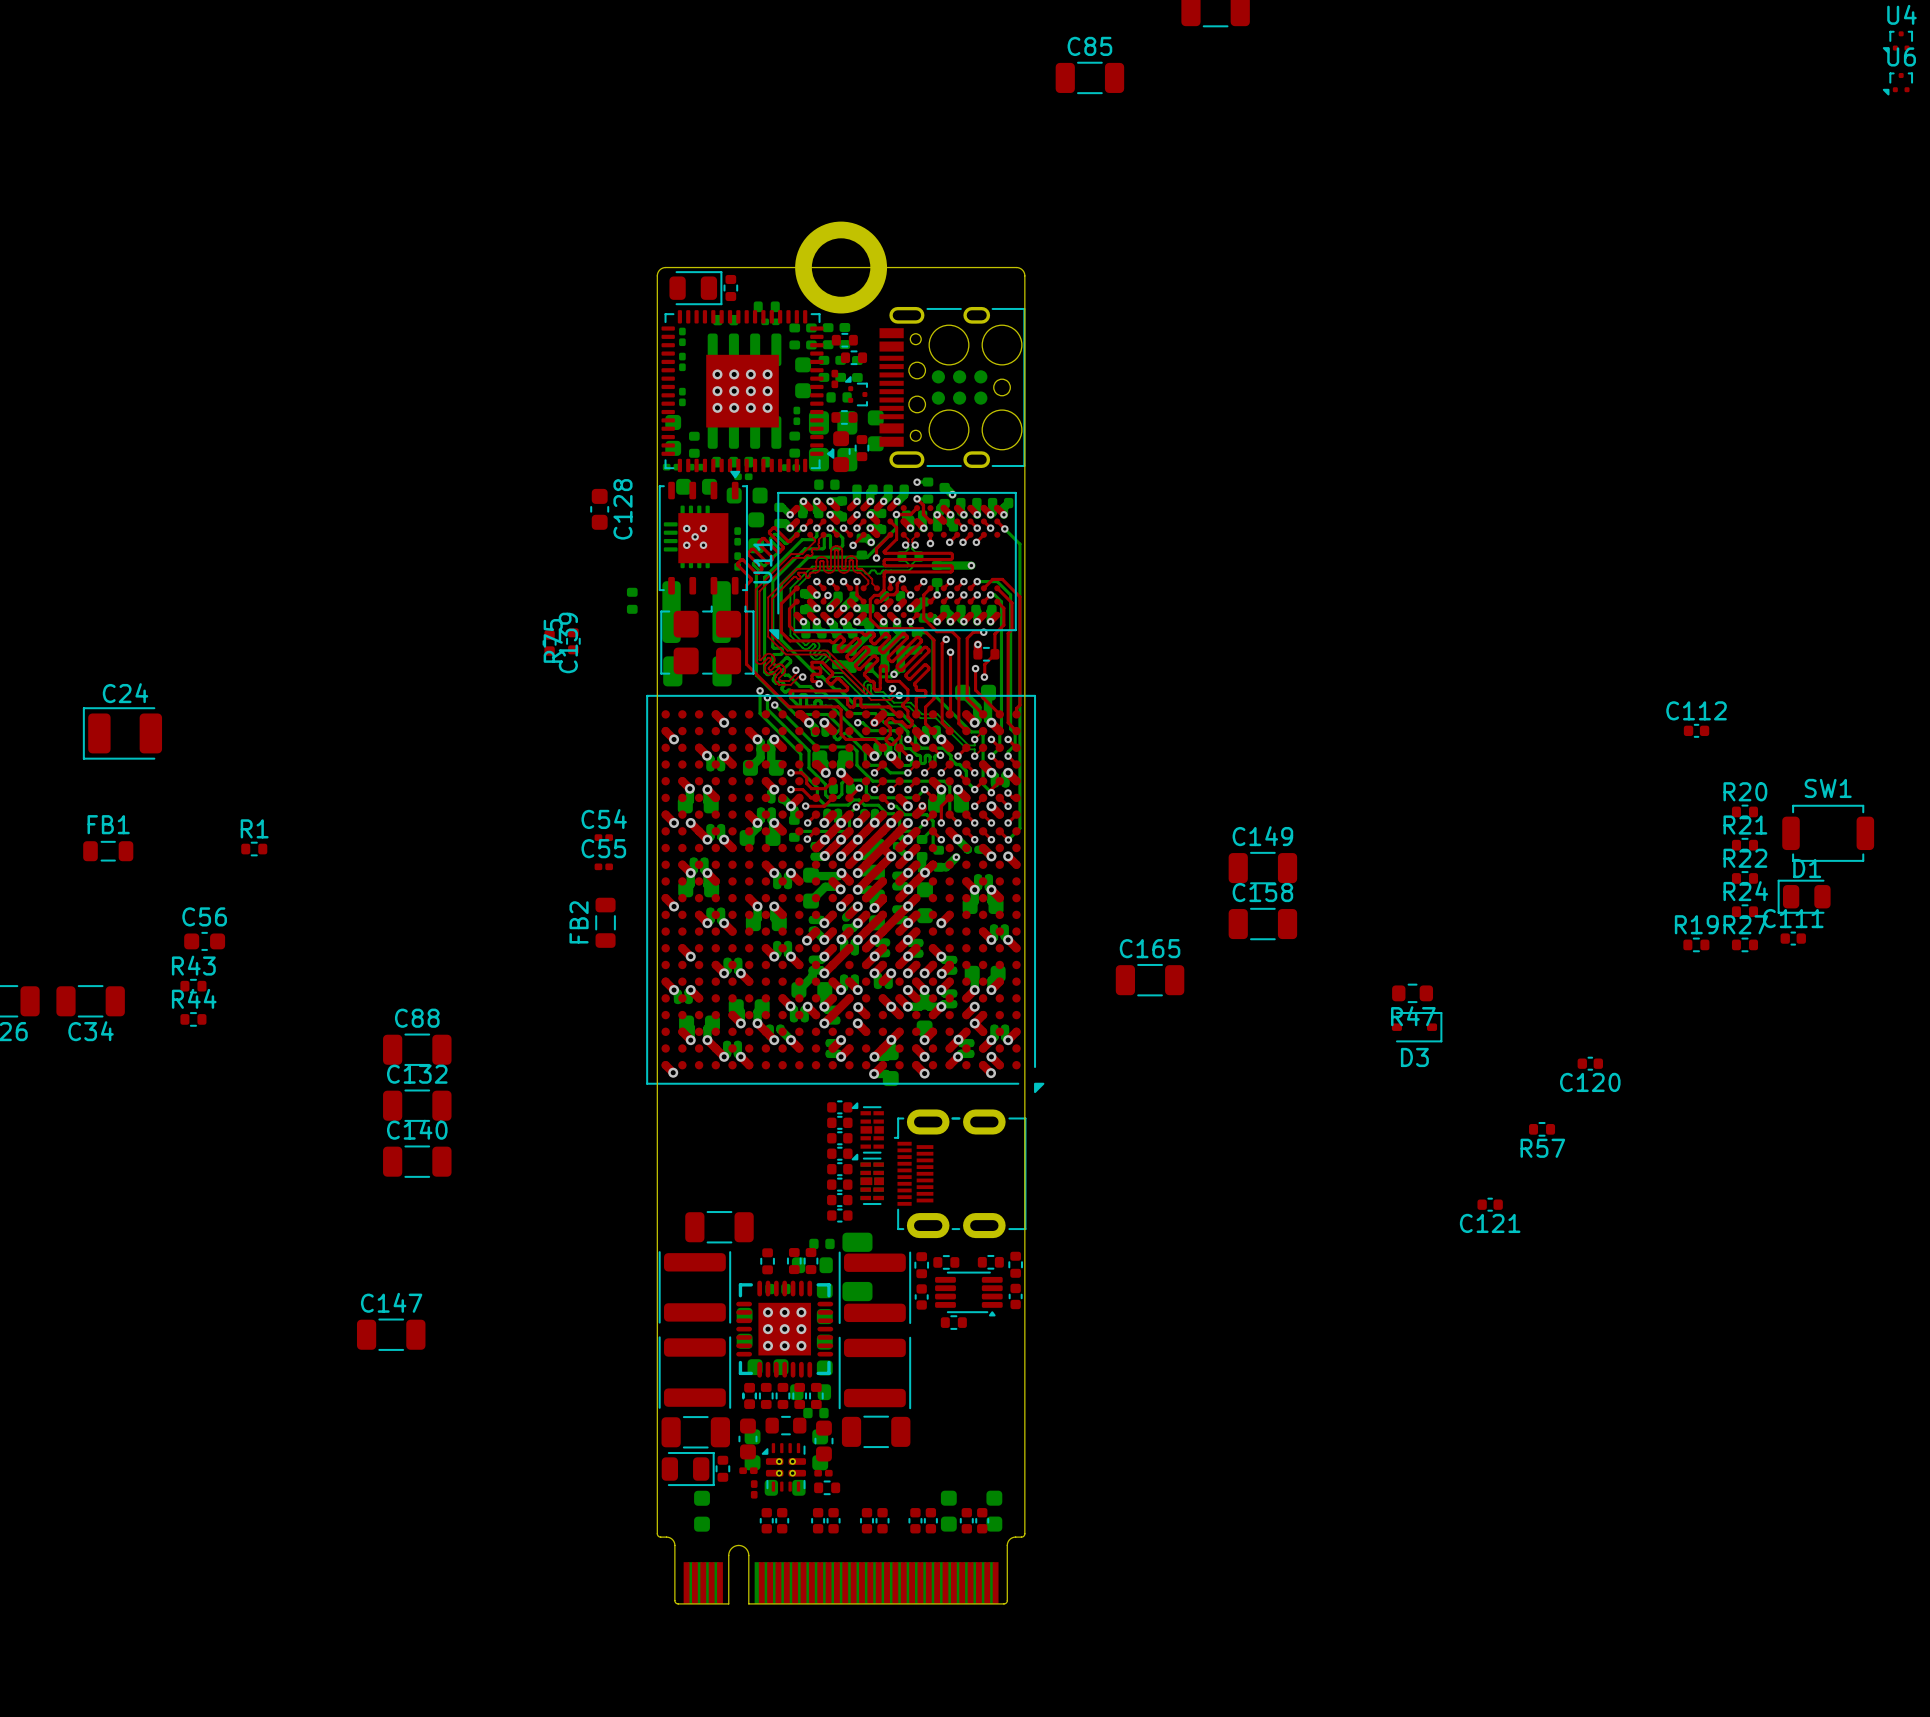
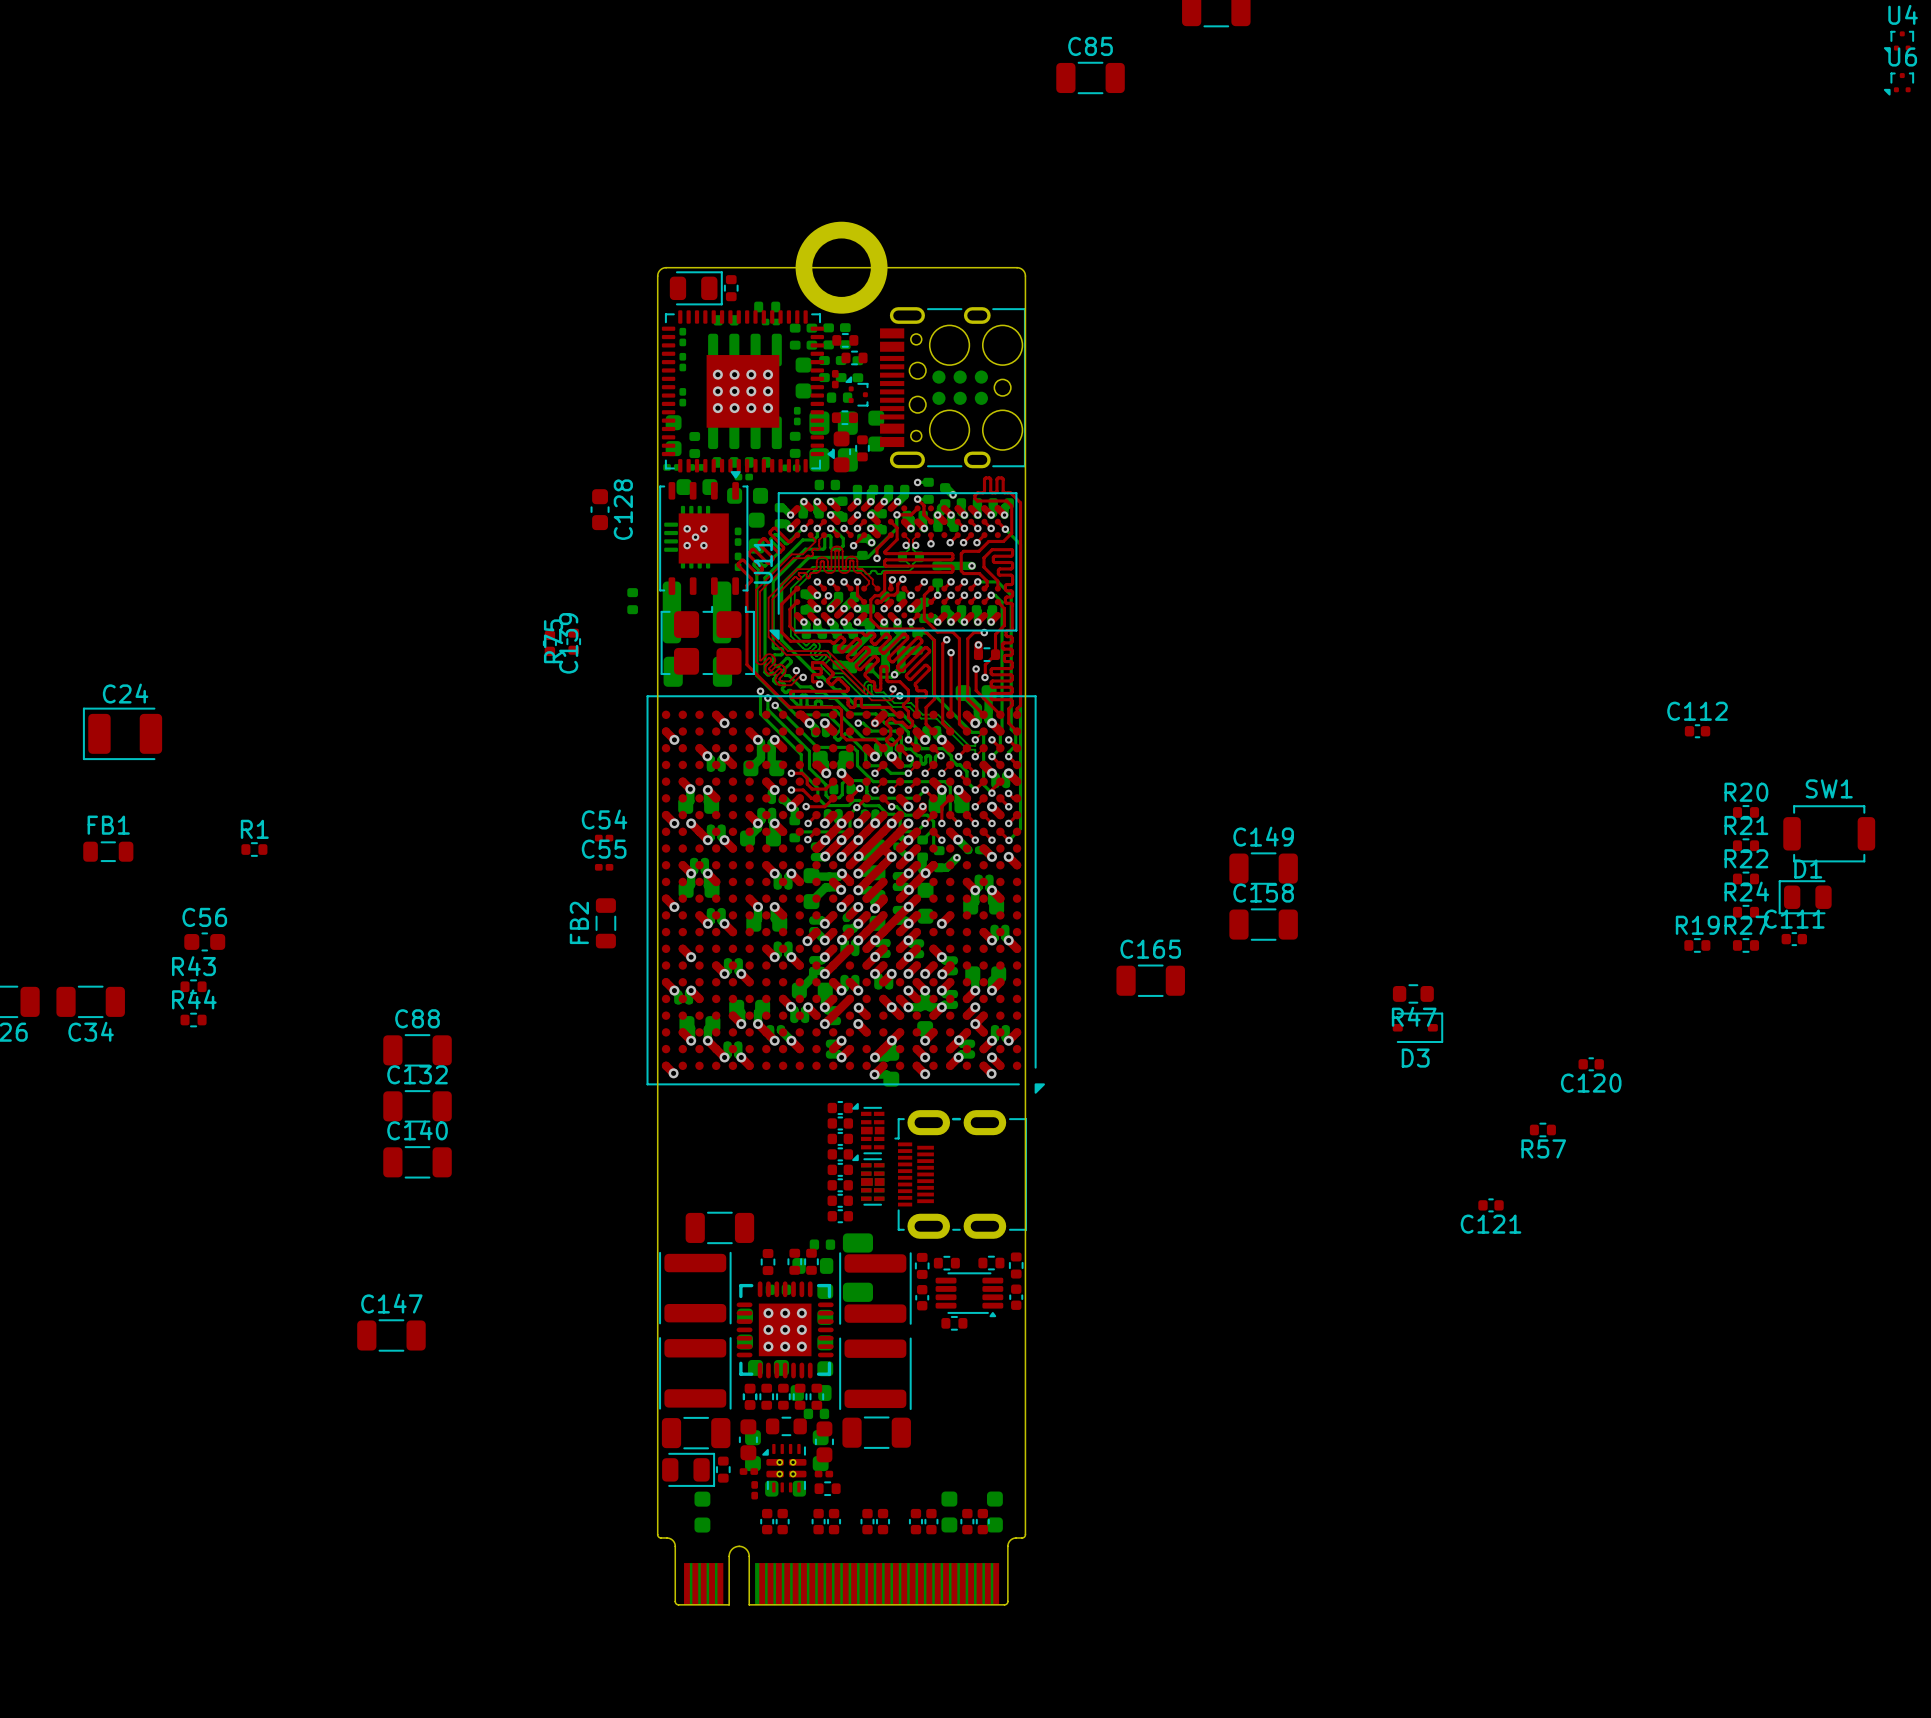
top track: (986, 585) (992, 579) (1002, 579) (1019, 596) -> (987, 585) (987, 581) (979, 573) (963, 573) (961, 570) (961, 553) (963, 551) (978, 551) (988, 541) (1003, 541) (1011, 533) (1011, 506) (1006, 501) (977, 501) (974, 498) (977, 492) (984, 491) (985, 478) (990, 478) (990, 491) (995, 492) (997, 478) (1001, 477) (1003, 492) (1010, 492) (1020, 502) (1020, 597)
top track: (997, 588) (1011, 602) (1011, 629) (1008, 633) (1008, 708) -> (997, 588) (997, 581) (983, 567) (983, 557) (992, 549) (1011, 549) (1011, 556) (993, 557) (994, 562) (1012, 563) (1011, 568) (998, 570) (999, 575) (1012, 576) (1012, 584) (1005, 586) (1005, 590) (1012, 592) (1011, 596) (1005, 598) (1005, 602) (1012, 604) (1012, 629) (1006, 632) (1006, 636) (1011, 637) (1012, 641) (1002, 644) (1003, 648) (1012, 650) (1011, 654) (1005, 655) (1004, 660) (1011, 662) (1012, 667) (991, 670) (992, 674) (1012, 675) (1011, 680) (991, 682) (992, 687) (1011, 687) (1011, 693) (991, 694) (992, 699) (1011, 700) (1012, 705) (1008, 708)

